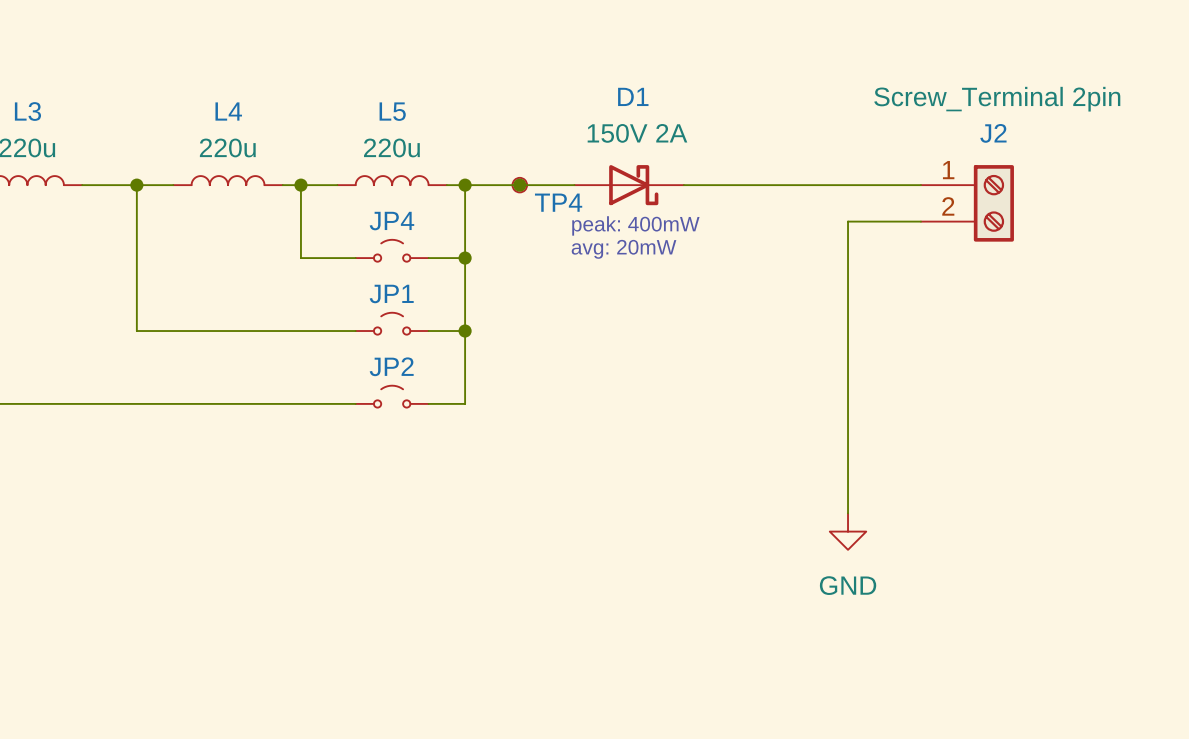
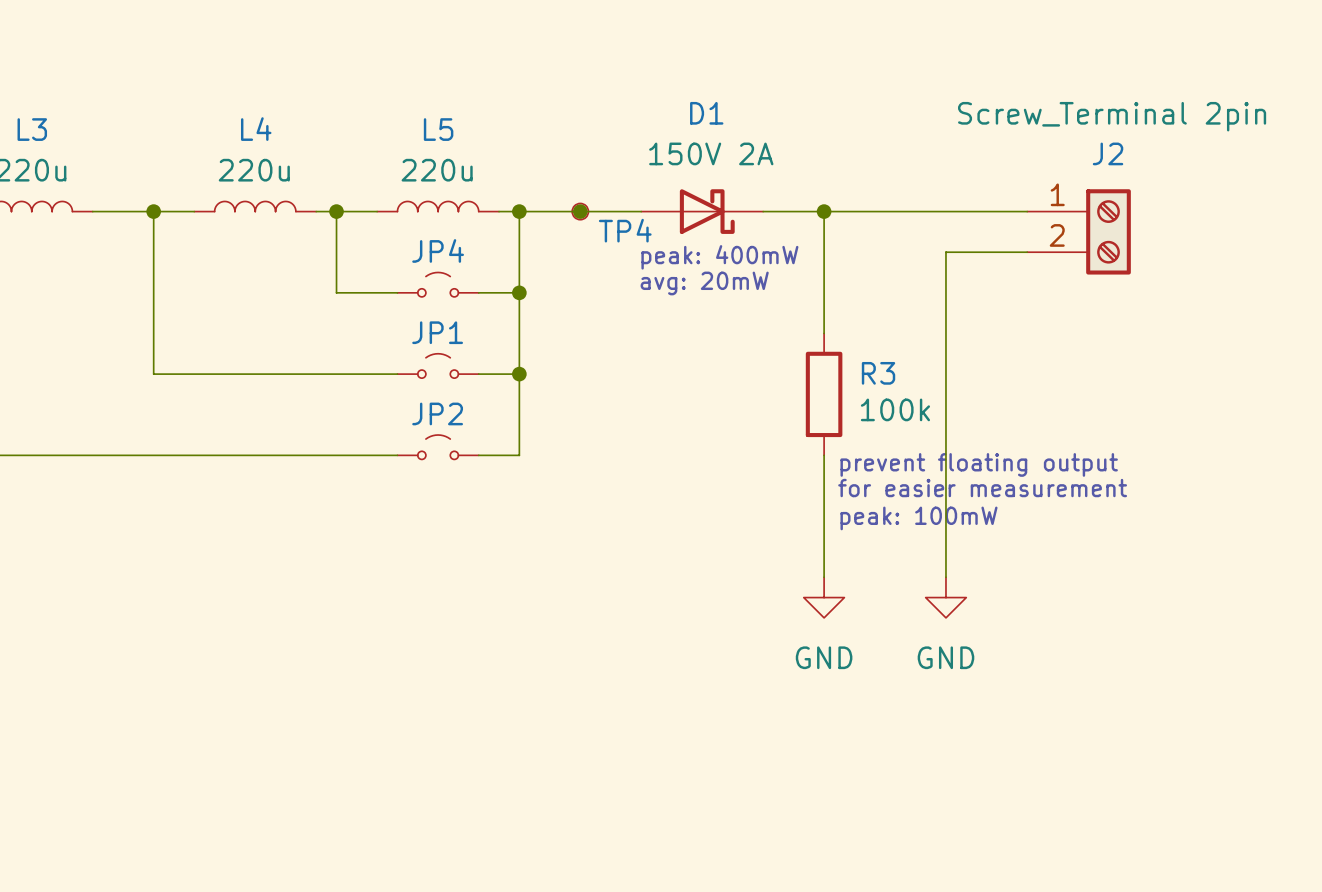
wire: none -> (824, 211) (824, 333)
junction: none -> (824, 211)
R3: none -> 100k (824, 394)
wire: none -> (824, 455) (824, 577)
text: none -> prevent floating output (979, 464)
text: none -> for easier measurement (982, 488)
text: none -> peak: 100mW (919, 518)
power symbol: none -> GND (824, 597)

